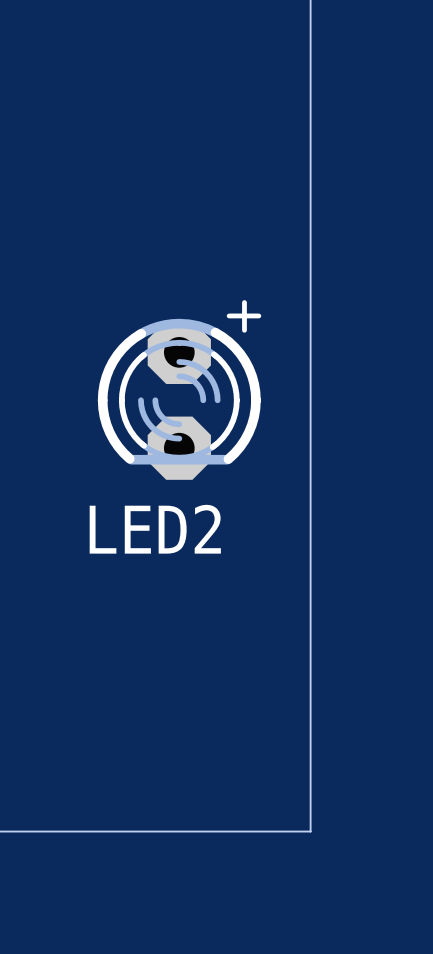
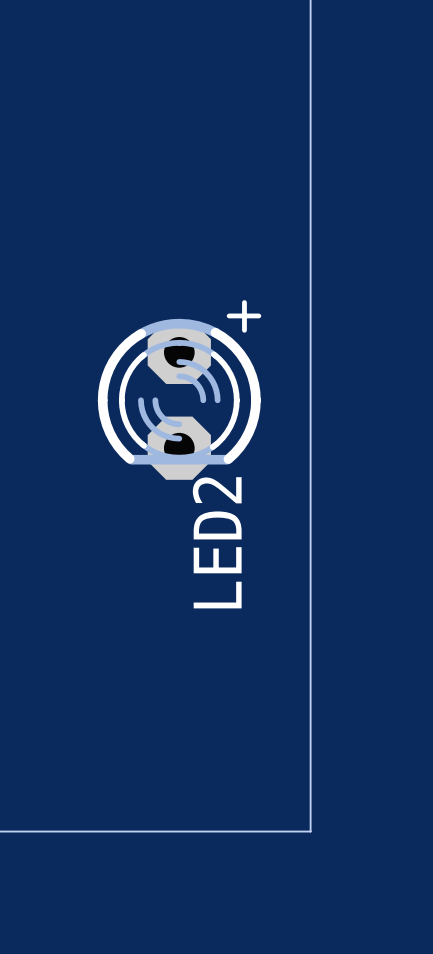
LED2 name rotation: 0° (155, 529) -> 90° counterclockwise (217, 542)

